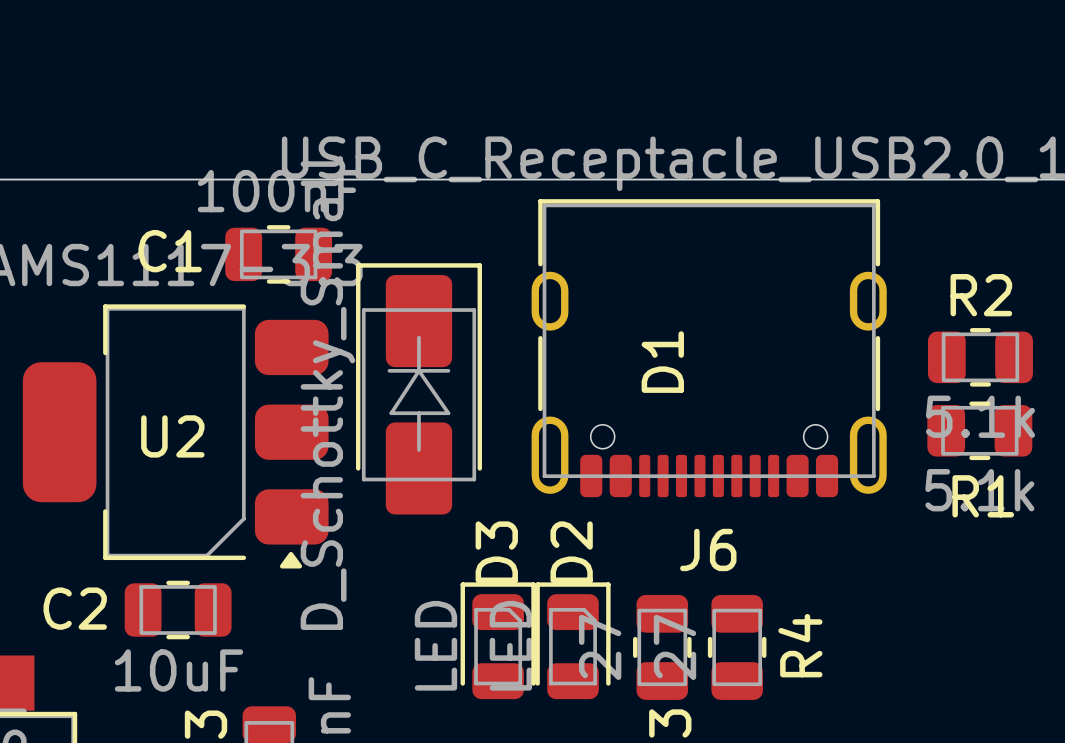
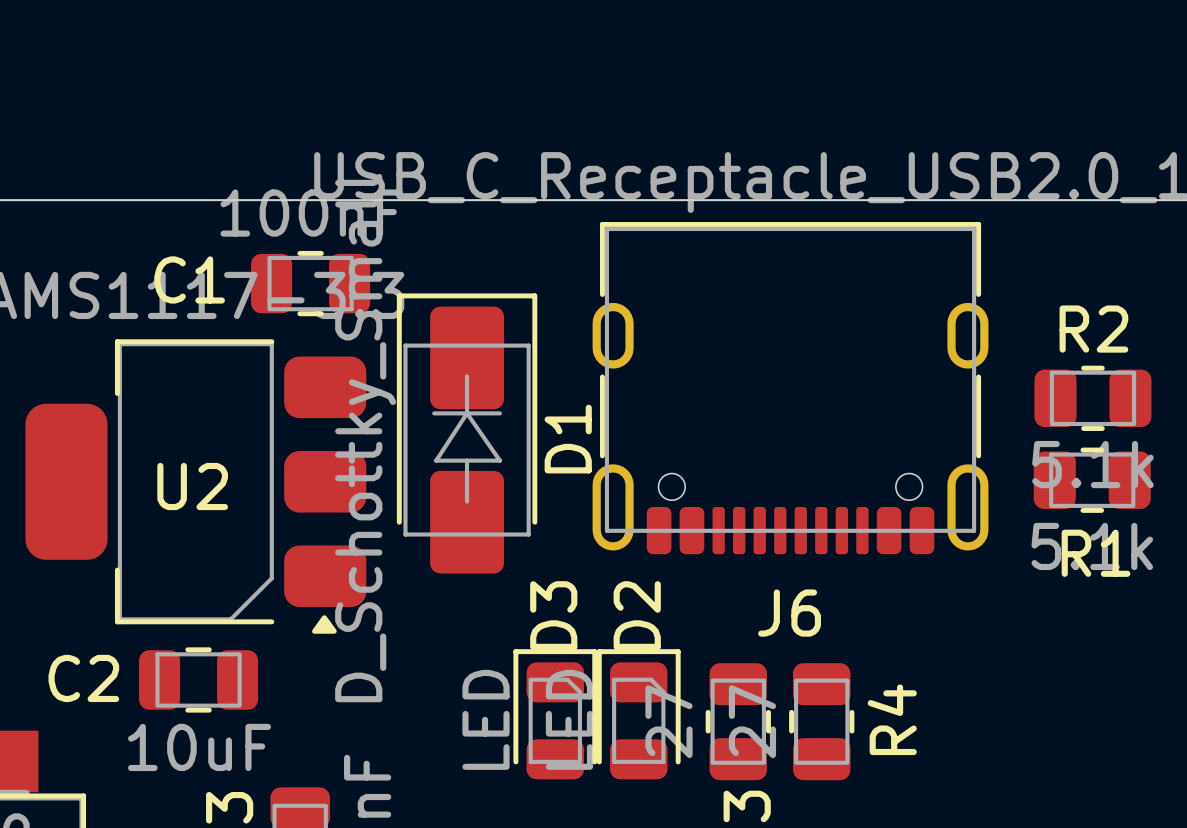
D1 name position: D1 (662, 362) -> D1 (568, 439)

